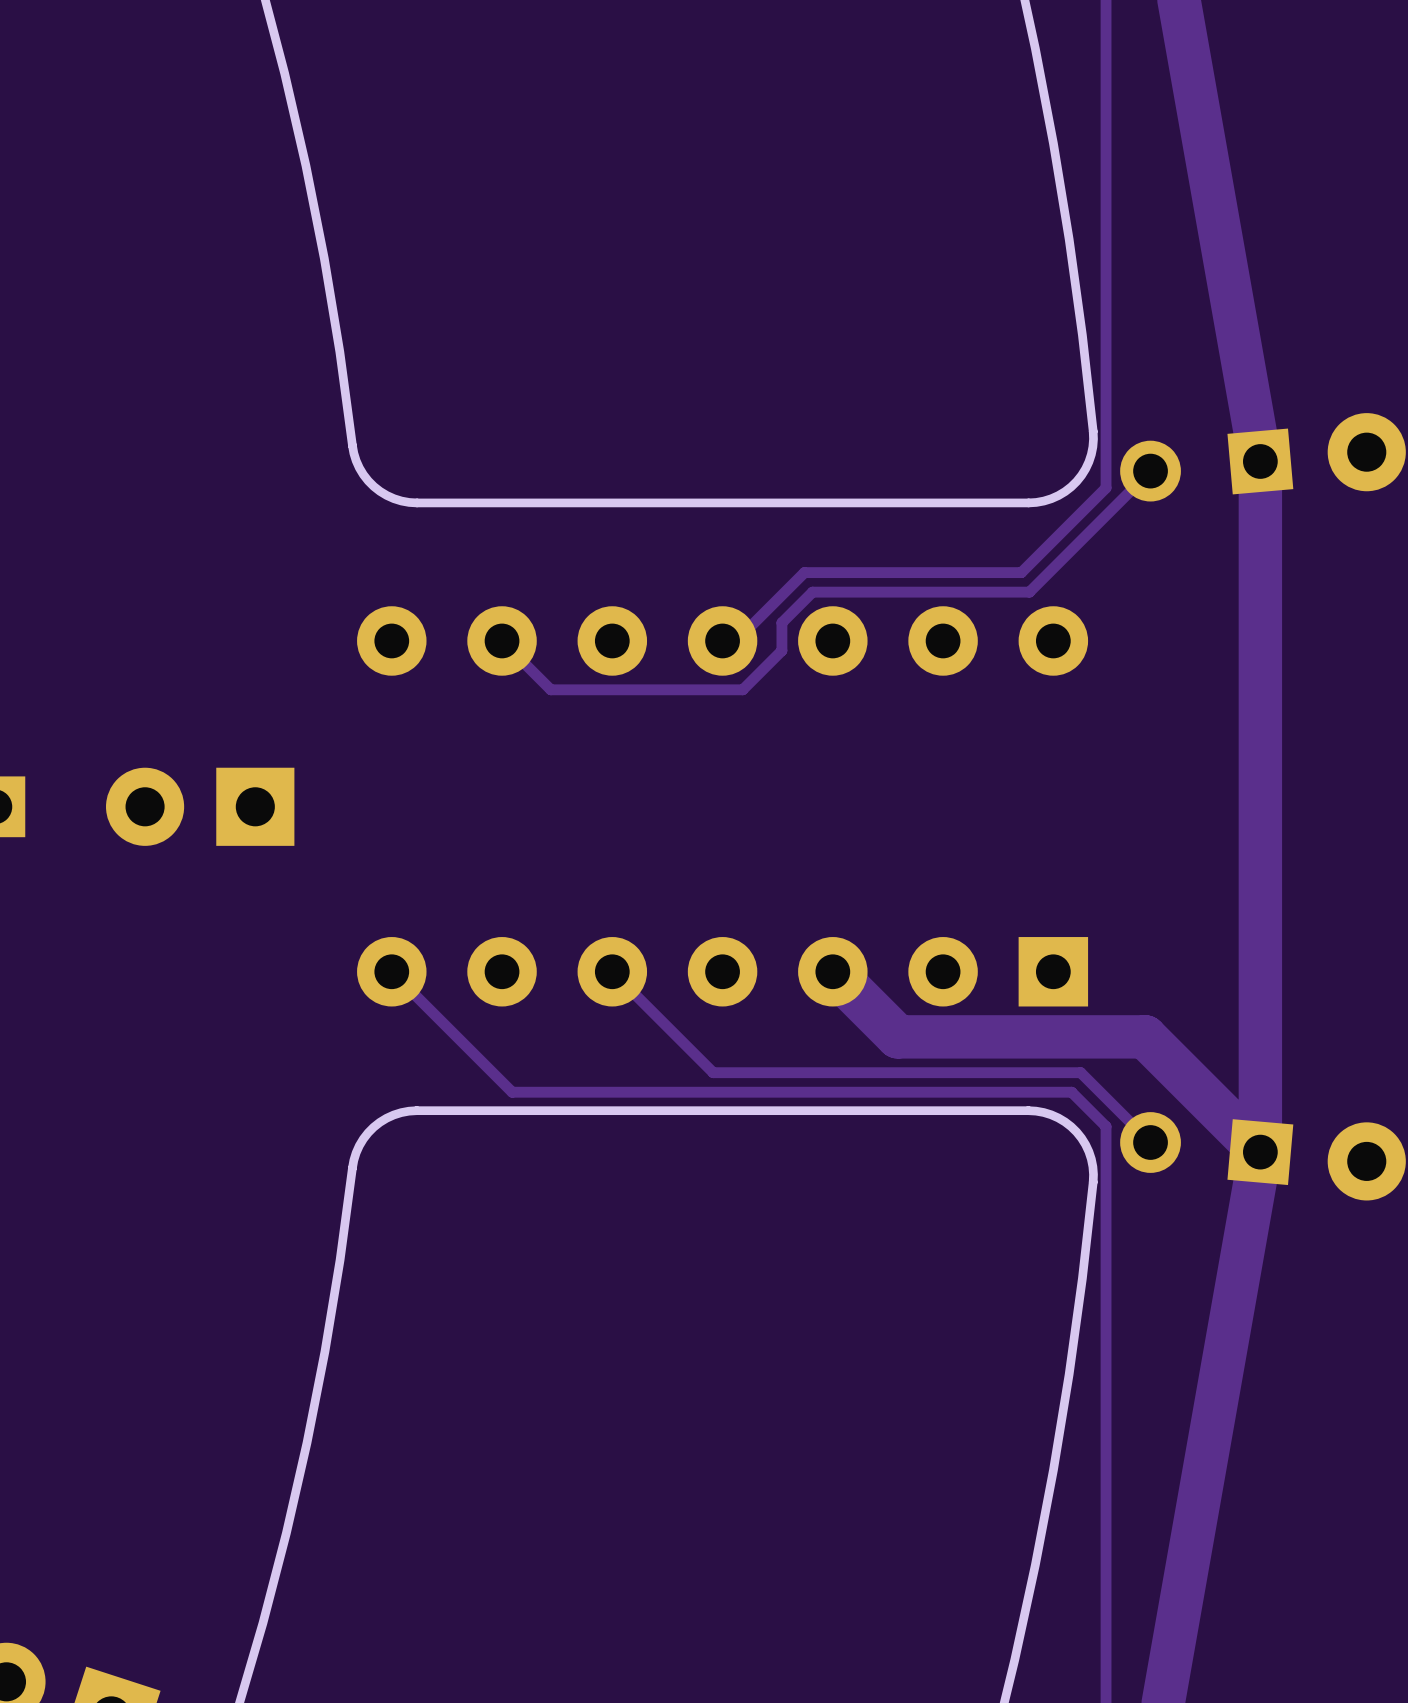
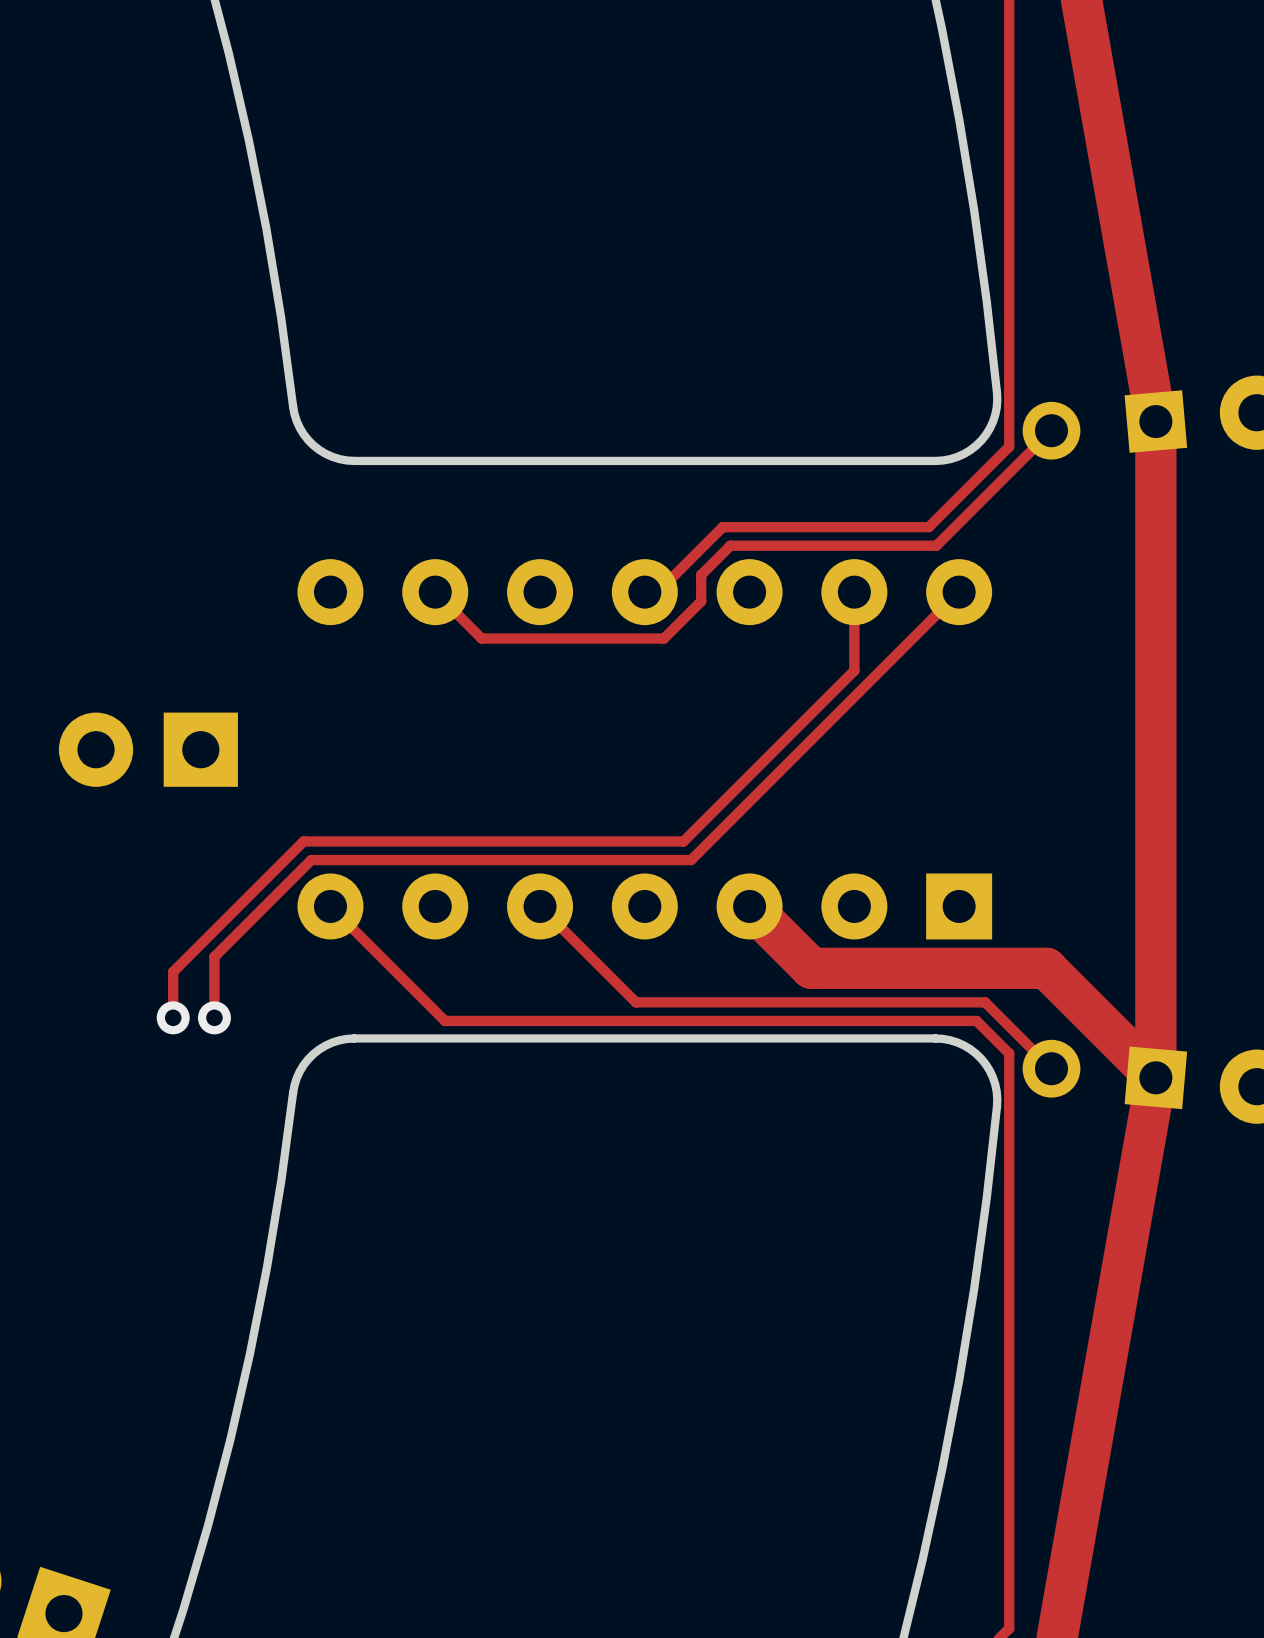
track: none -> (854, 592) (854, 670) (683, 841) (303, 841) (173, 971) (173, 1017)
track: none -> (959, 592) (691, 860) (311, 860) (214, 956) (214, 1017)
via: none -> (173, 1017)
via: none -> (214, 1017)

